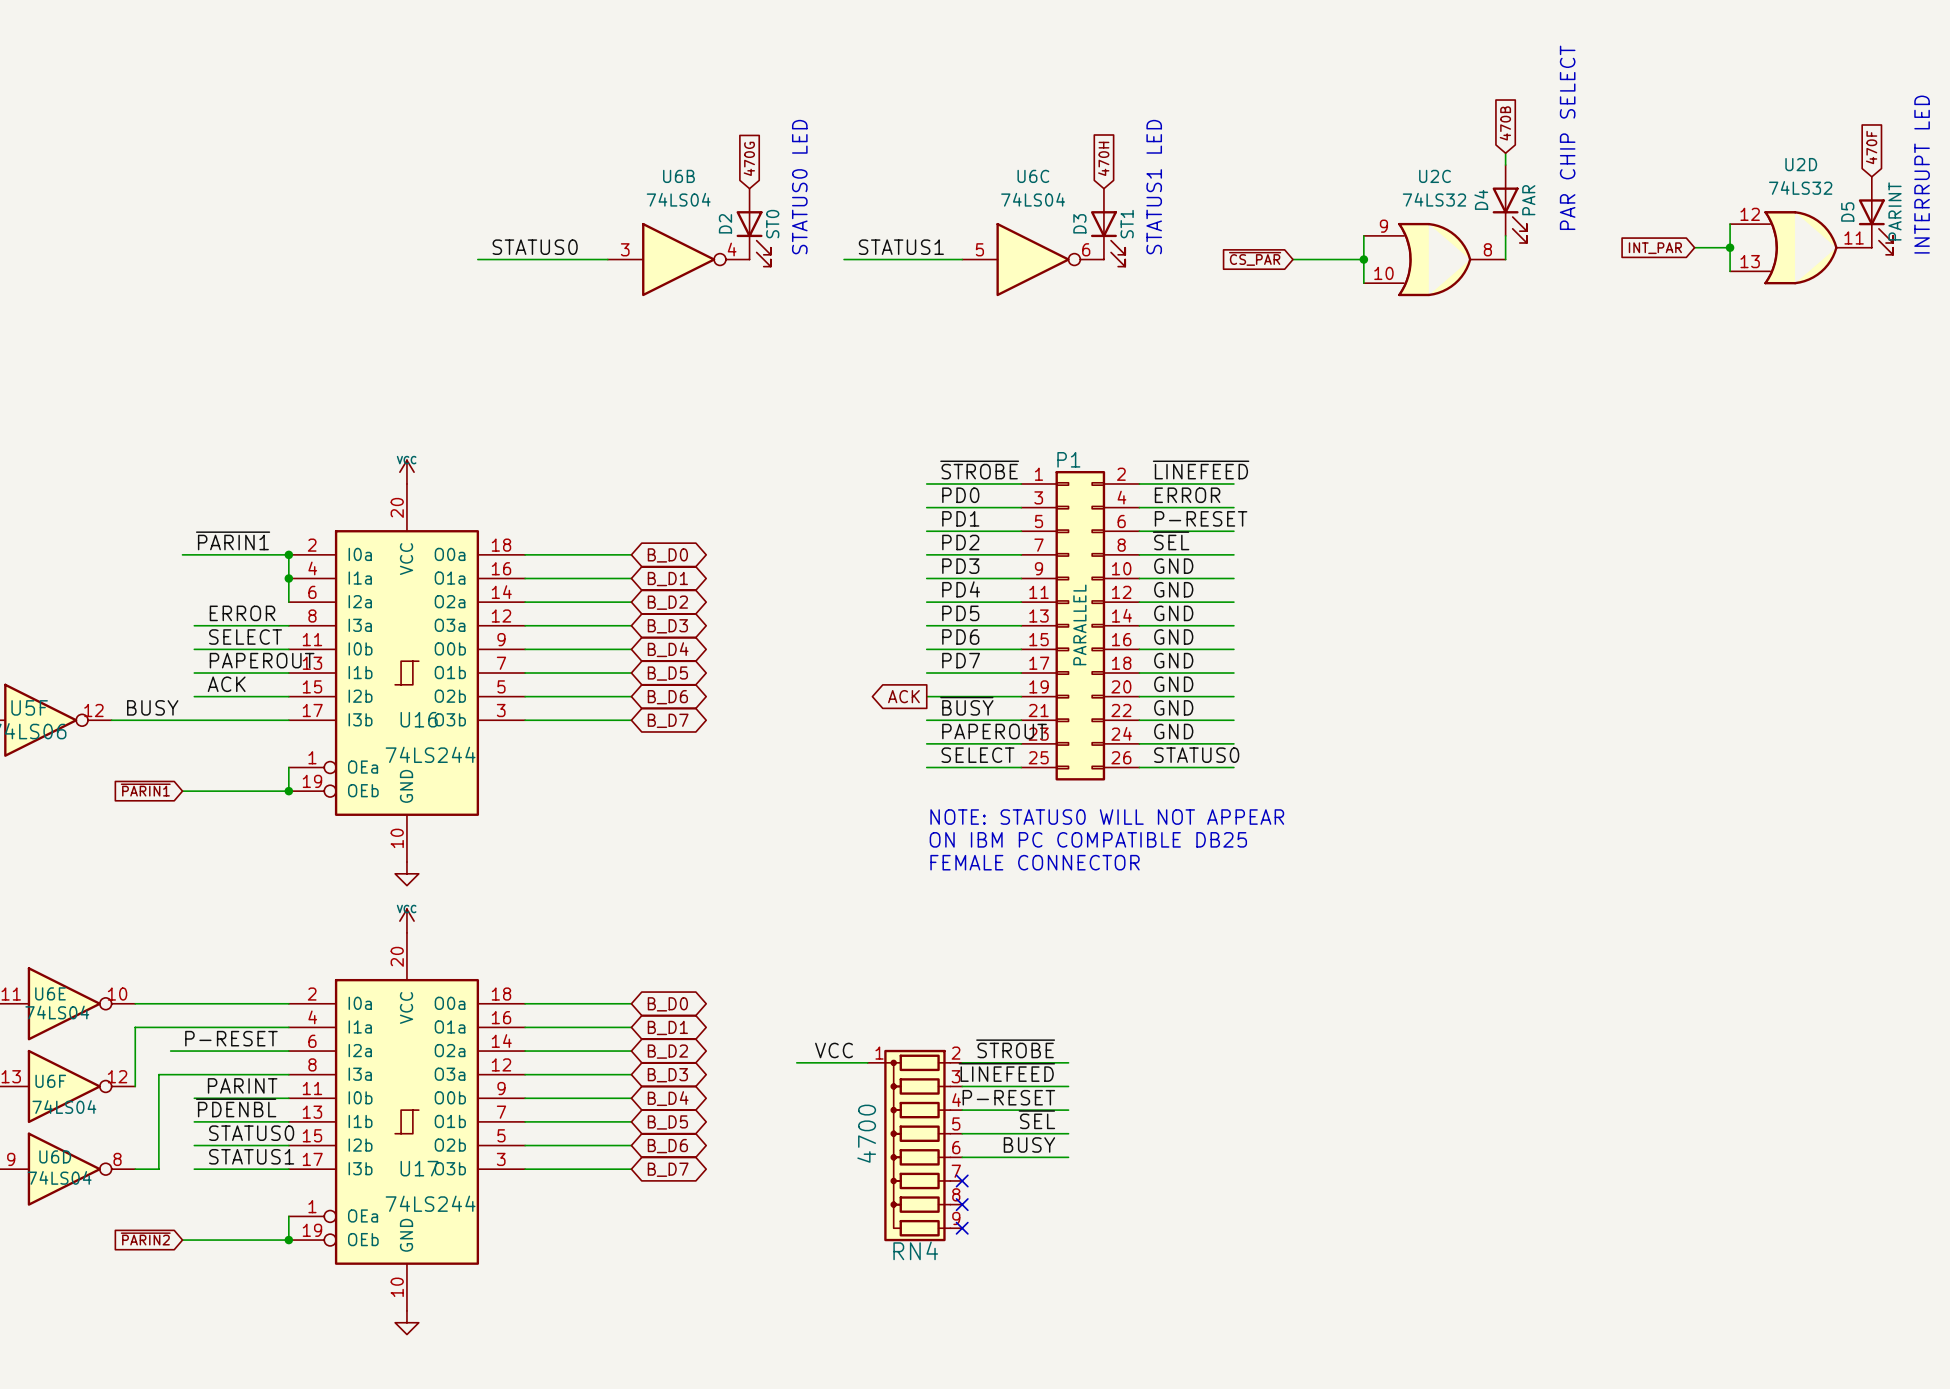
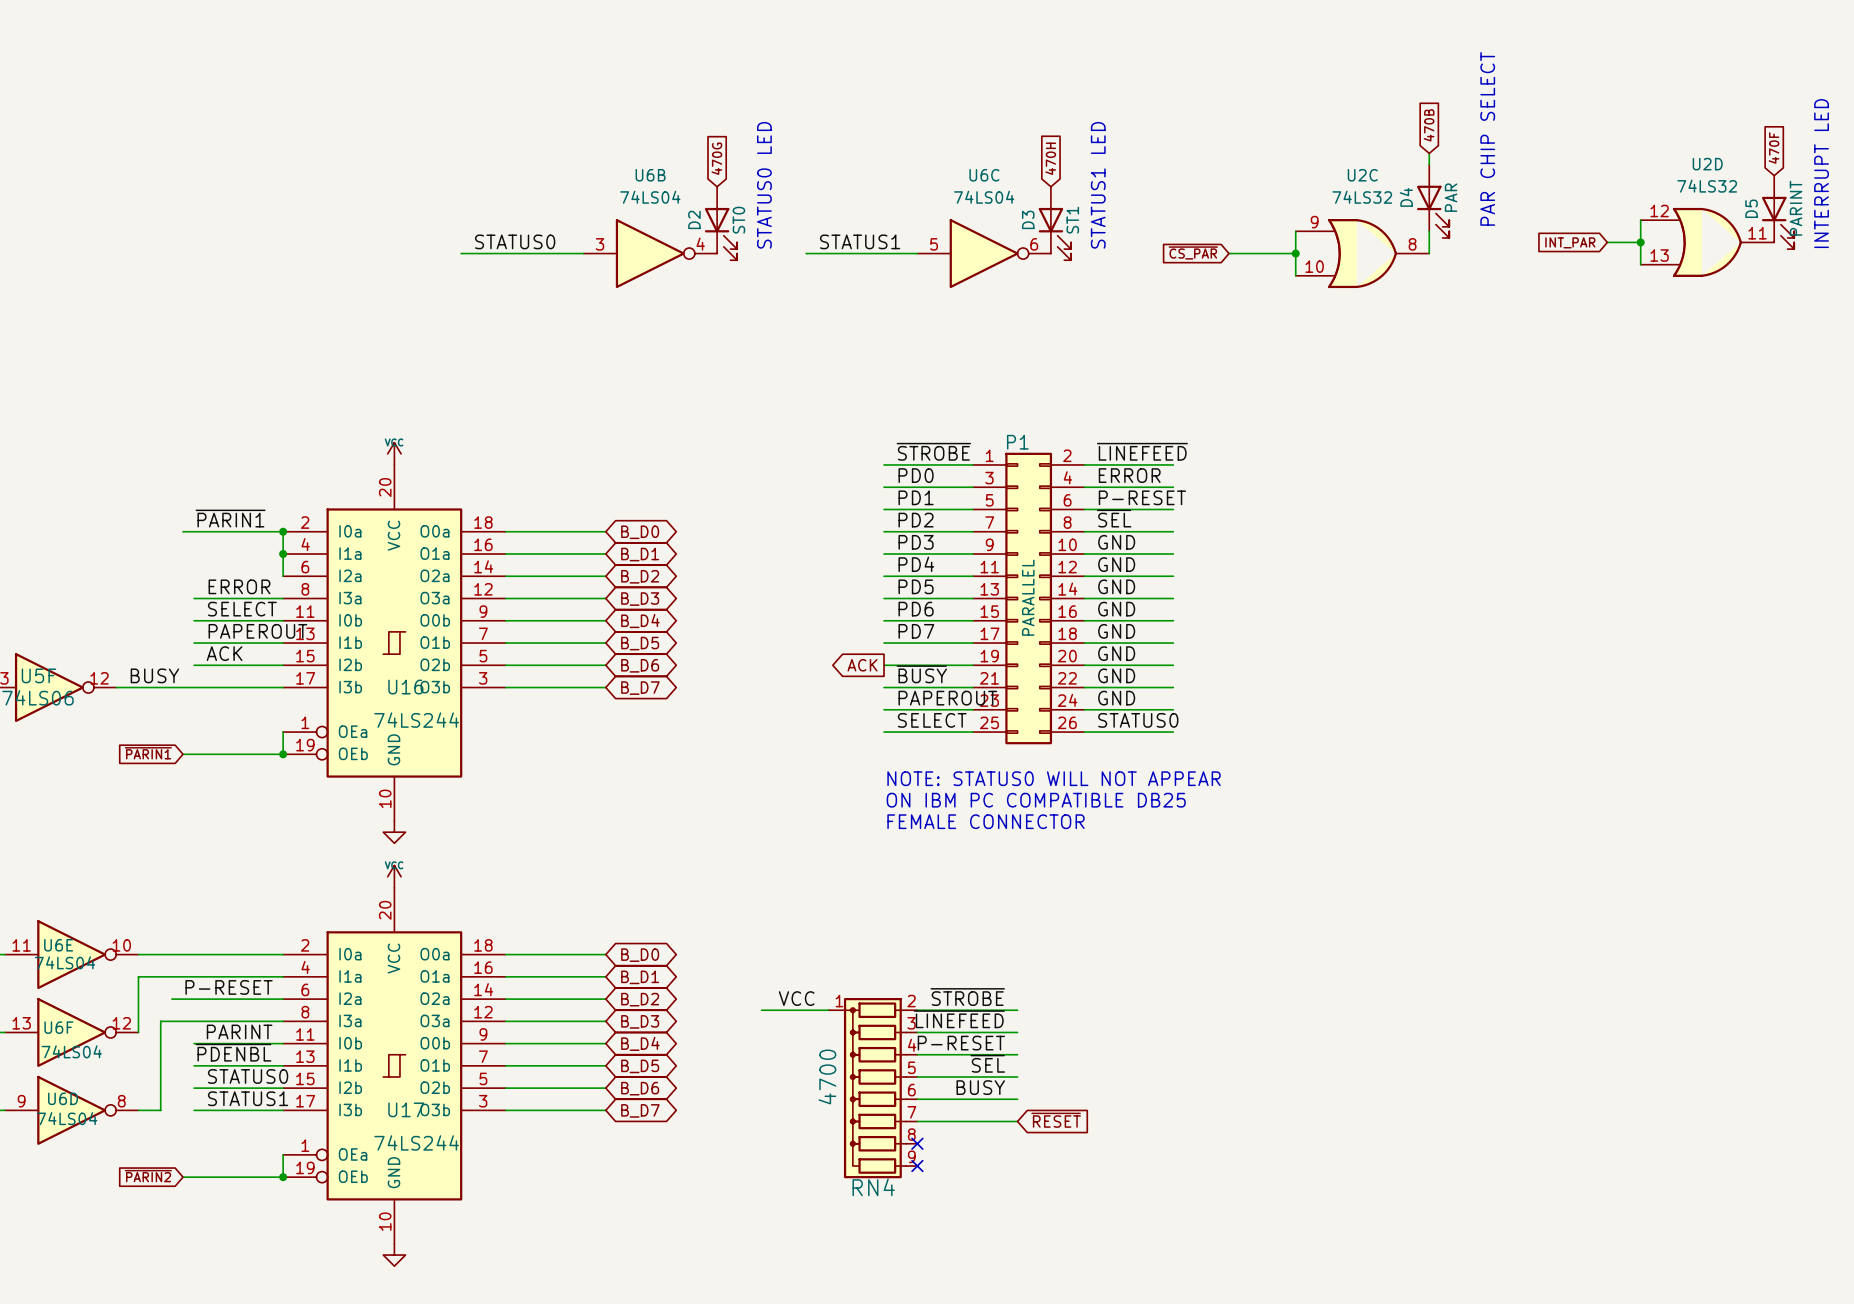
global label: none -> ~{RESET} (1056, 1120)
wire: none -> (917, 1121) (1017, 1121)
no-connect mark: (962, 1180) -> none

